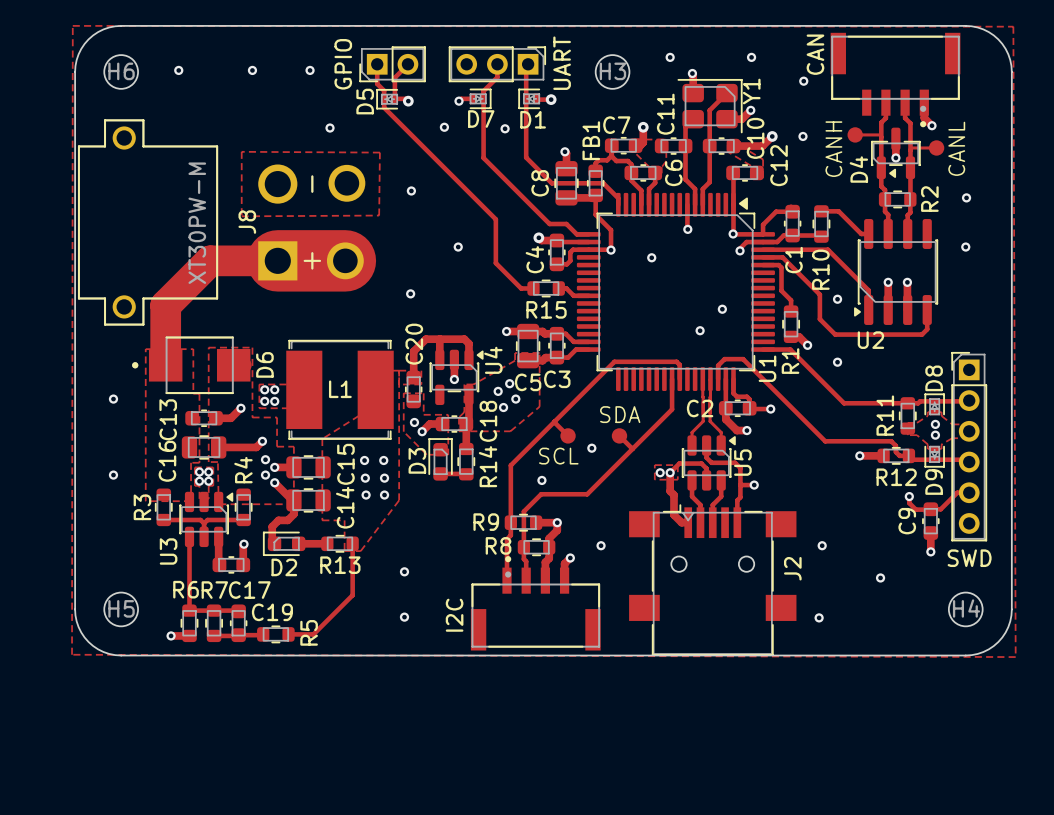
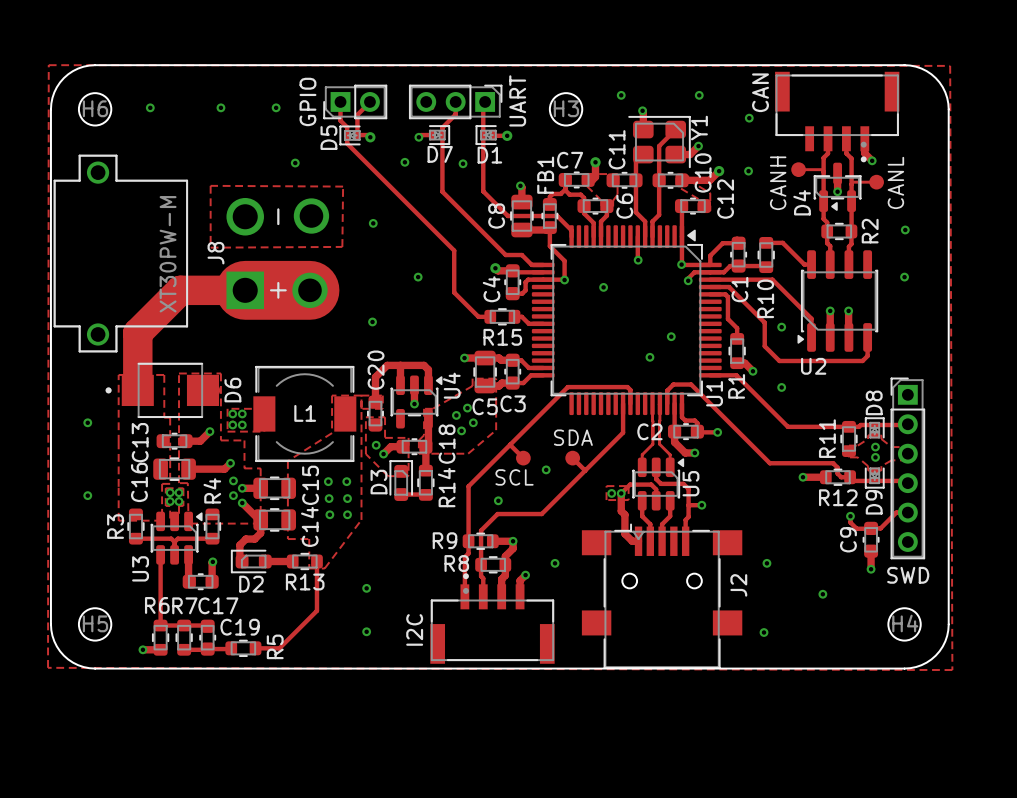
L1 footprint: [286, 339, 394, 440] -> [253, 365, 357, 462]

